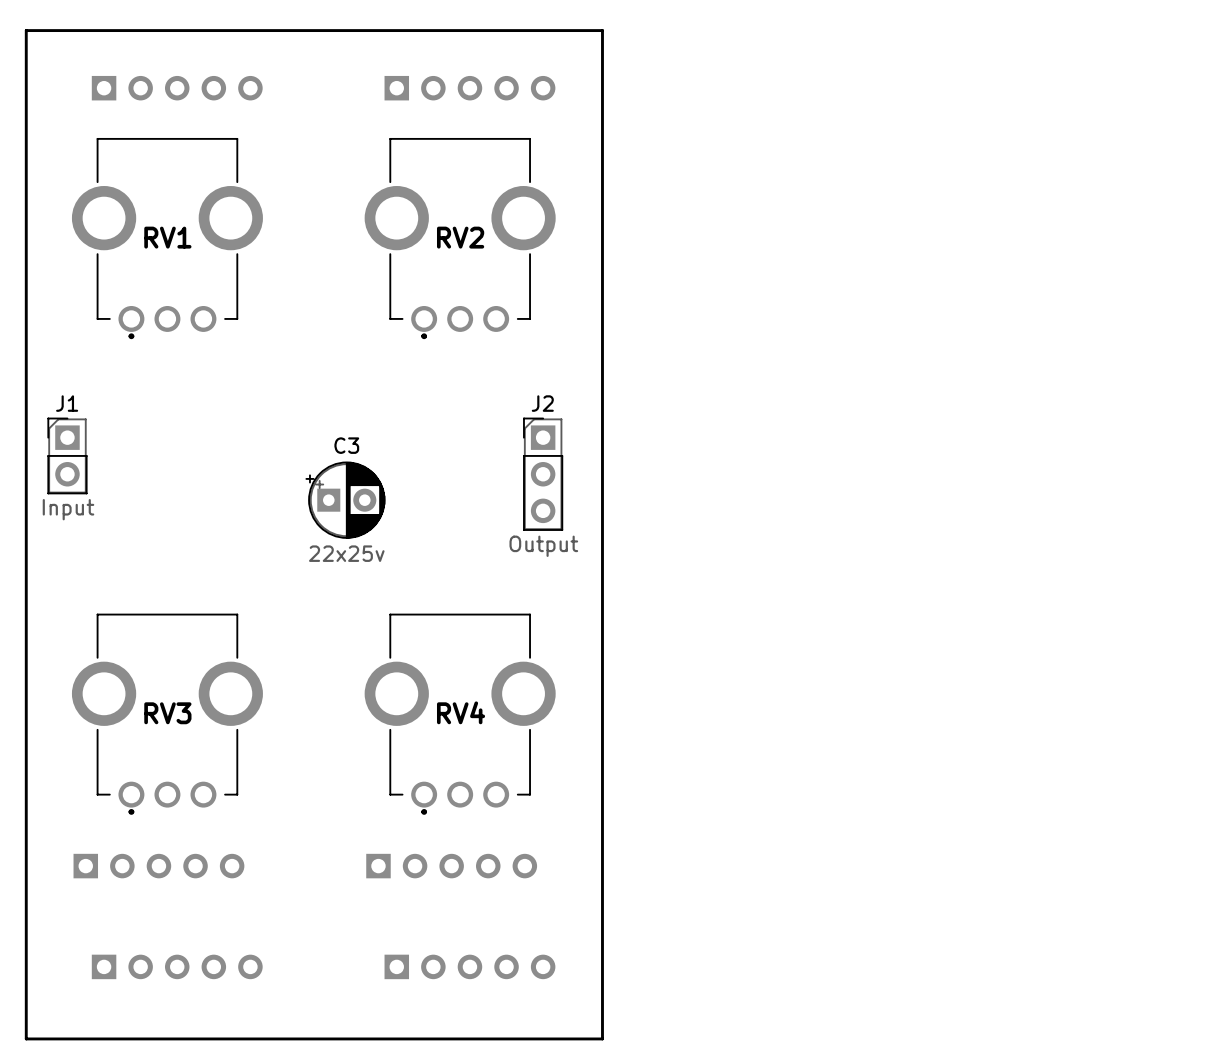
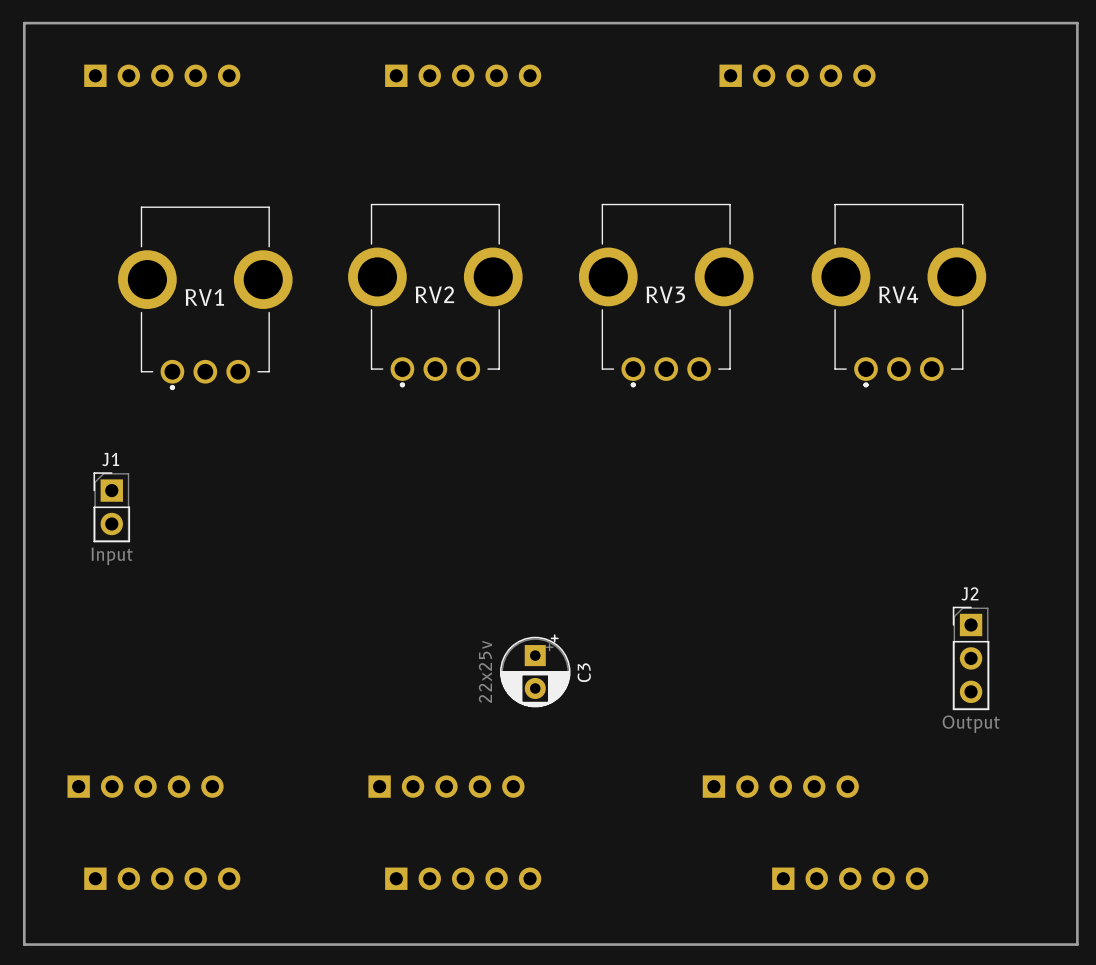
board edge: (602, 30) (602, 1038) -> (550, 23) (1077, 23) (1077, 944) (550, 944)
part position: (469, 88) -> (463, 75)
part: none -> (797, 75)
RV1 position: (167, 238) -> (205, 298)
RV2 position: (460, 238) -> (435, 295)
J1 position: (67, 455) -> (111, 507)
J2 position: (543, 474) -> (971, 658)
C3 rotation: 0° (345, 500) -> 90° clockwise (535, 670)
C3 position: (345, 500) -> (535, 670)
RV3 position: (167, 714) -> (666, 295)
RV4 position: (460, 714) -> (898, 295)
part position: (451, 866) -> (446, 786)
part: none -> (780, 786)
part position: (469, 966) -> (463, 878)
part: none -> (850, 878)

